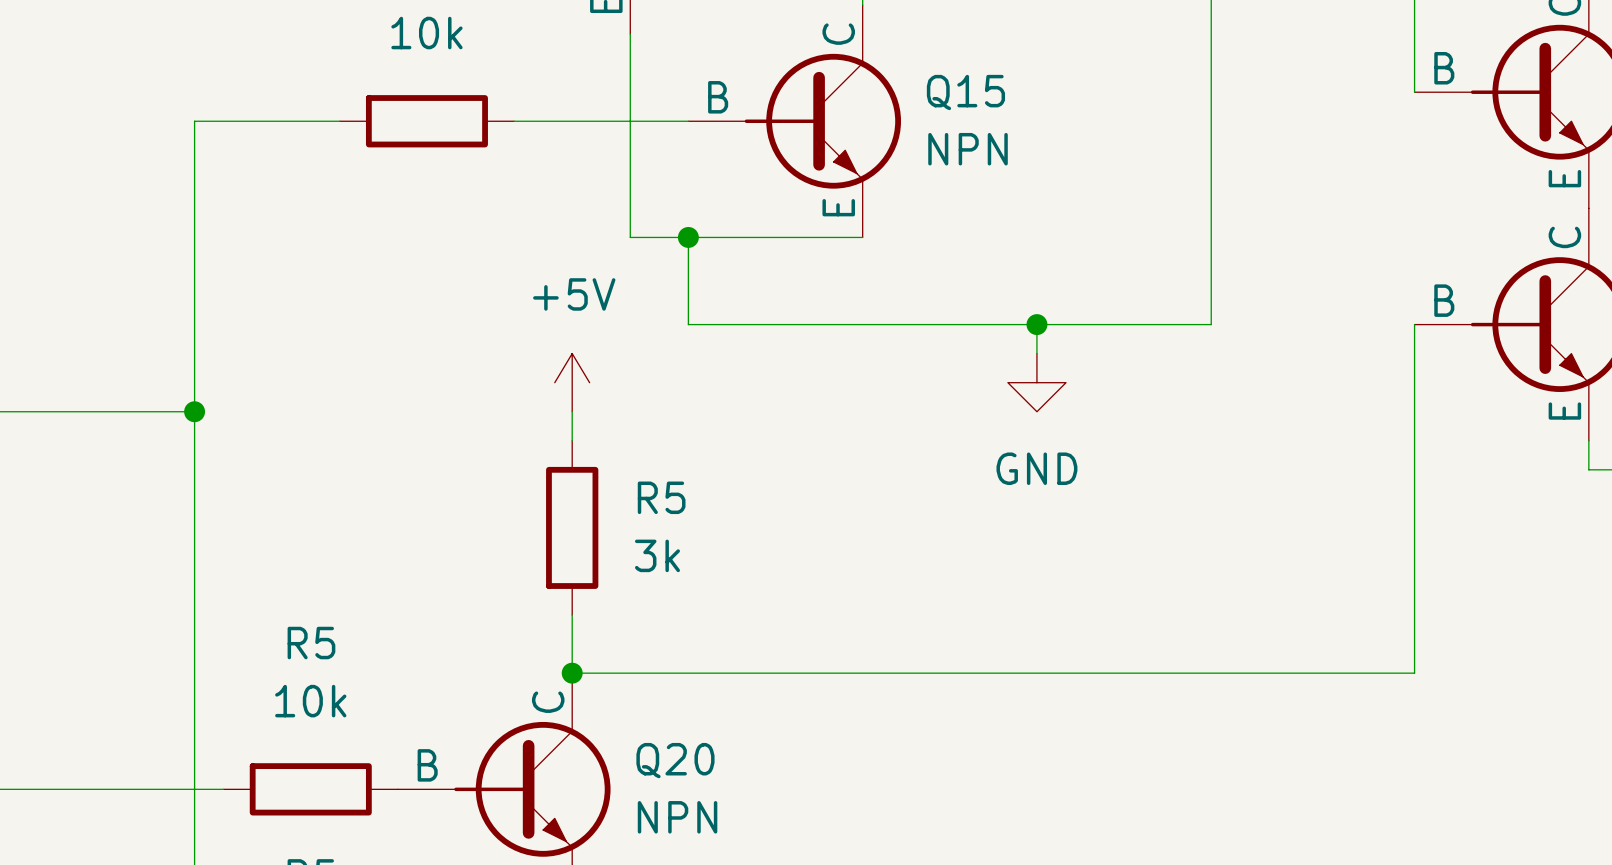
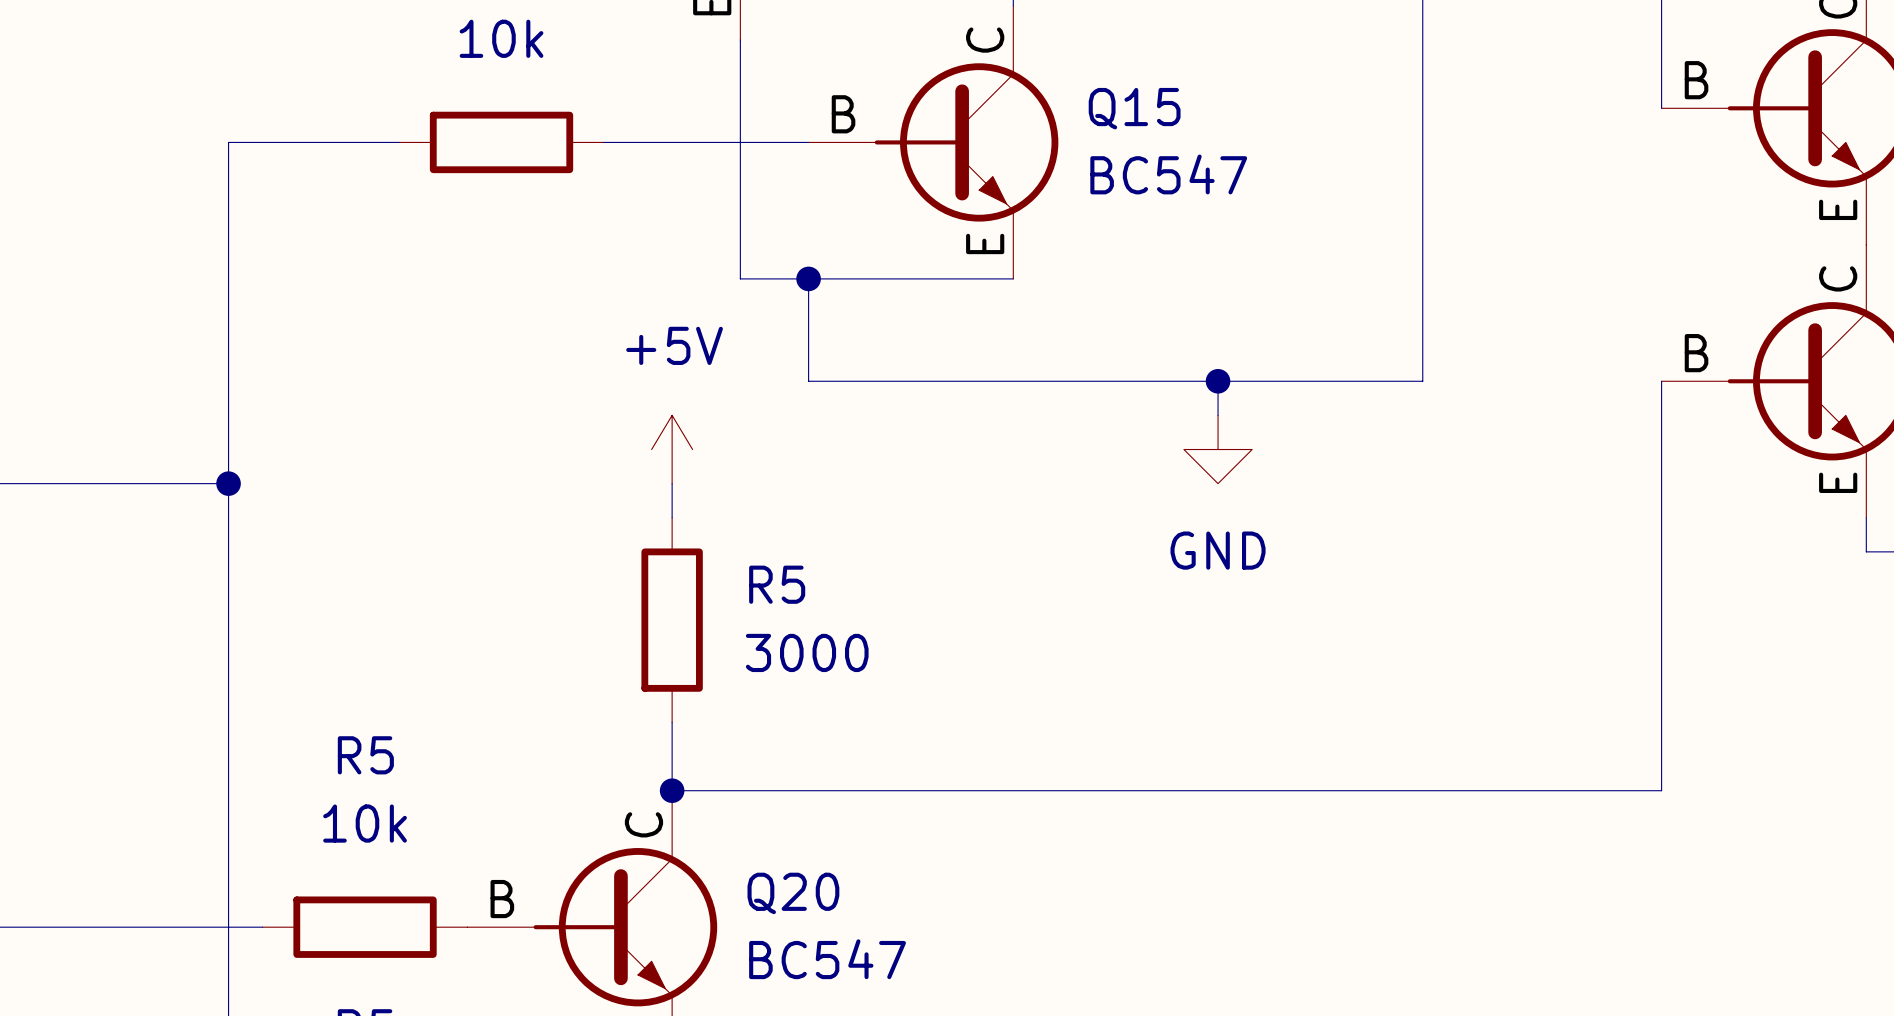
Q15 value: NPN (968, 149) -> BC547 (1168, 174)
R5 value: 3k (657, 555) -> 3000 (807, 652)
Q20 value: NPN (677, 817) -> BC547 (827, 959)

